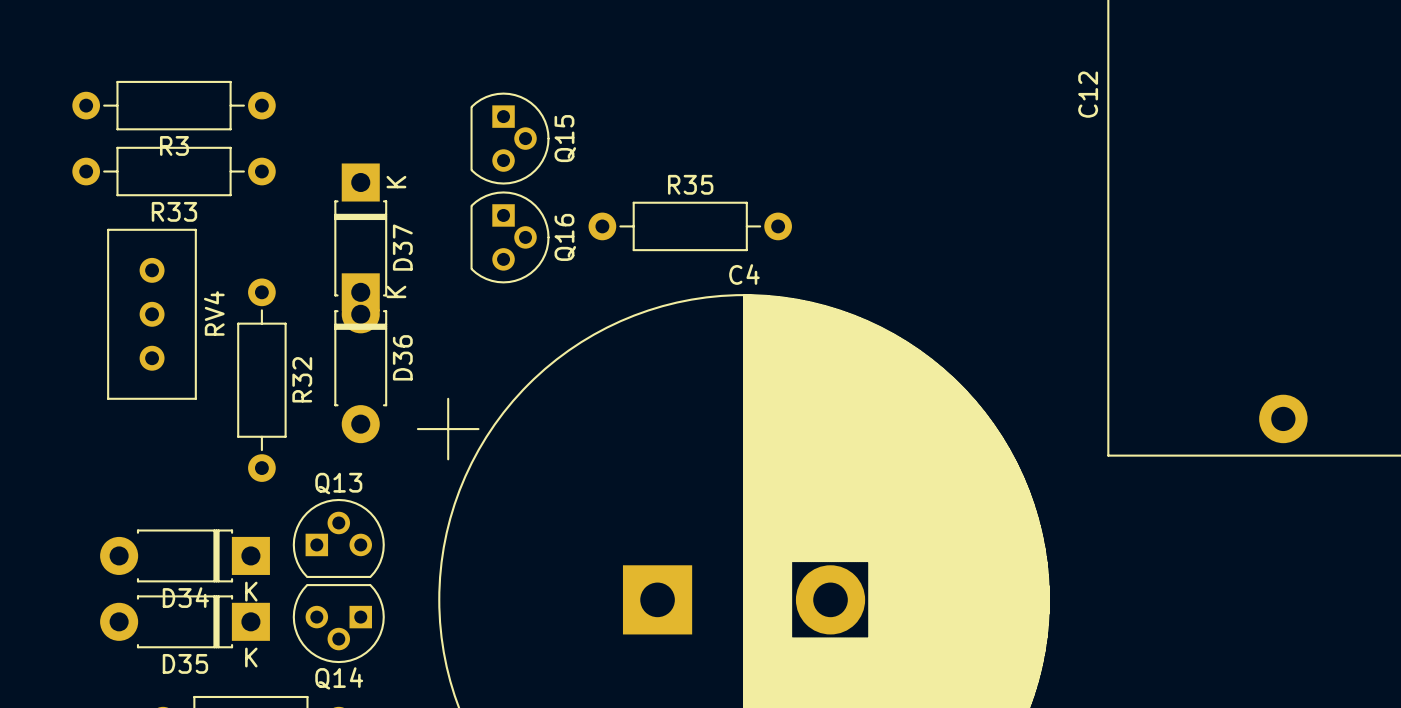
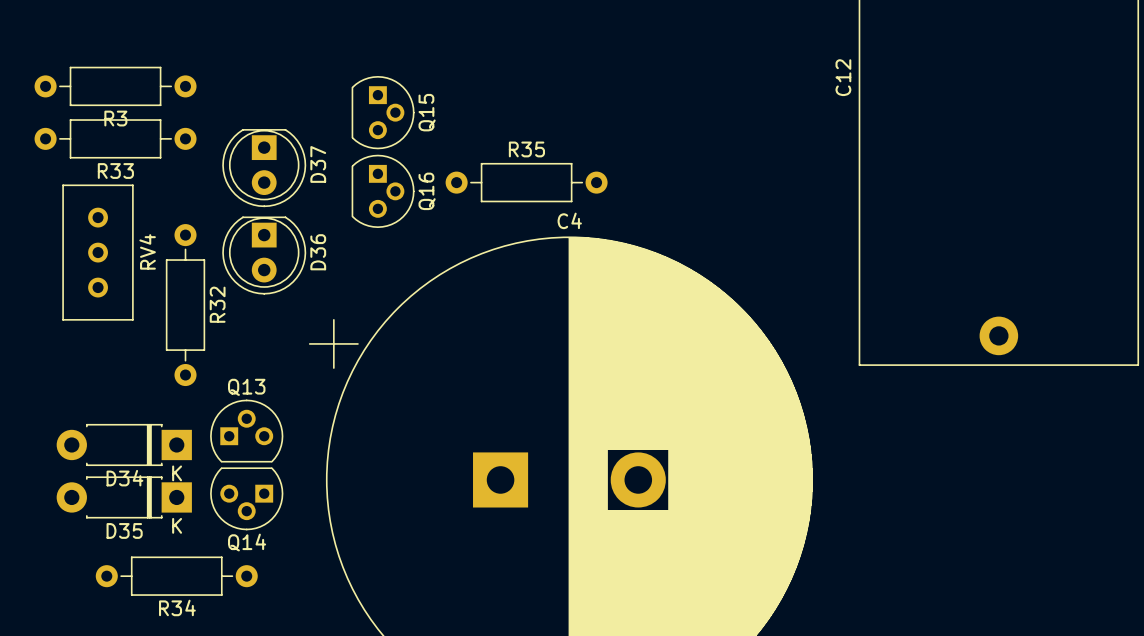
D37 footprint: [334, 163, 388, 334] -> [222, 129, 307, 208]
D36 footprint: [334, 273, 388, 444] -> [222, 216, 307, 295]

